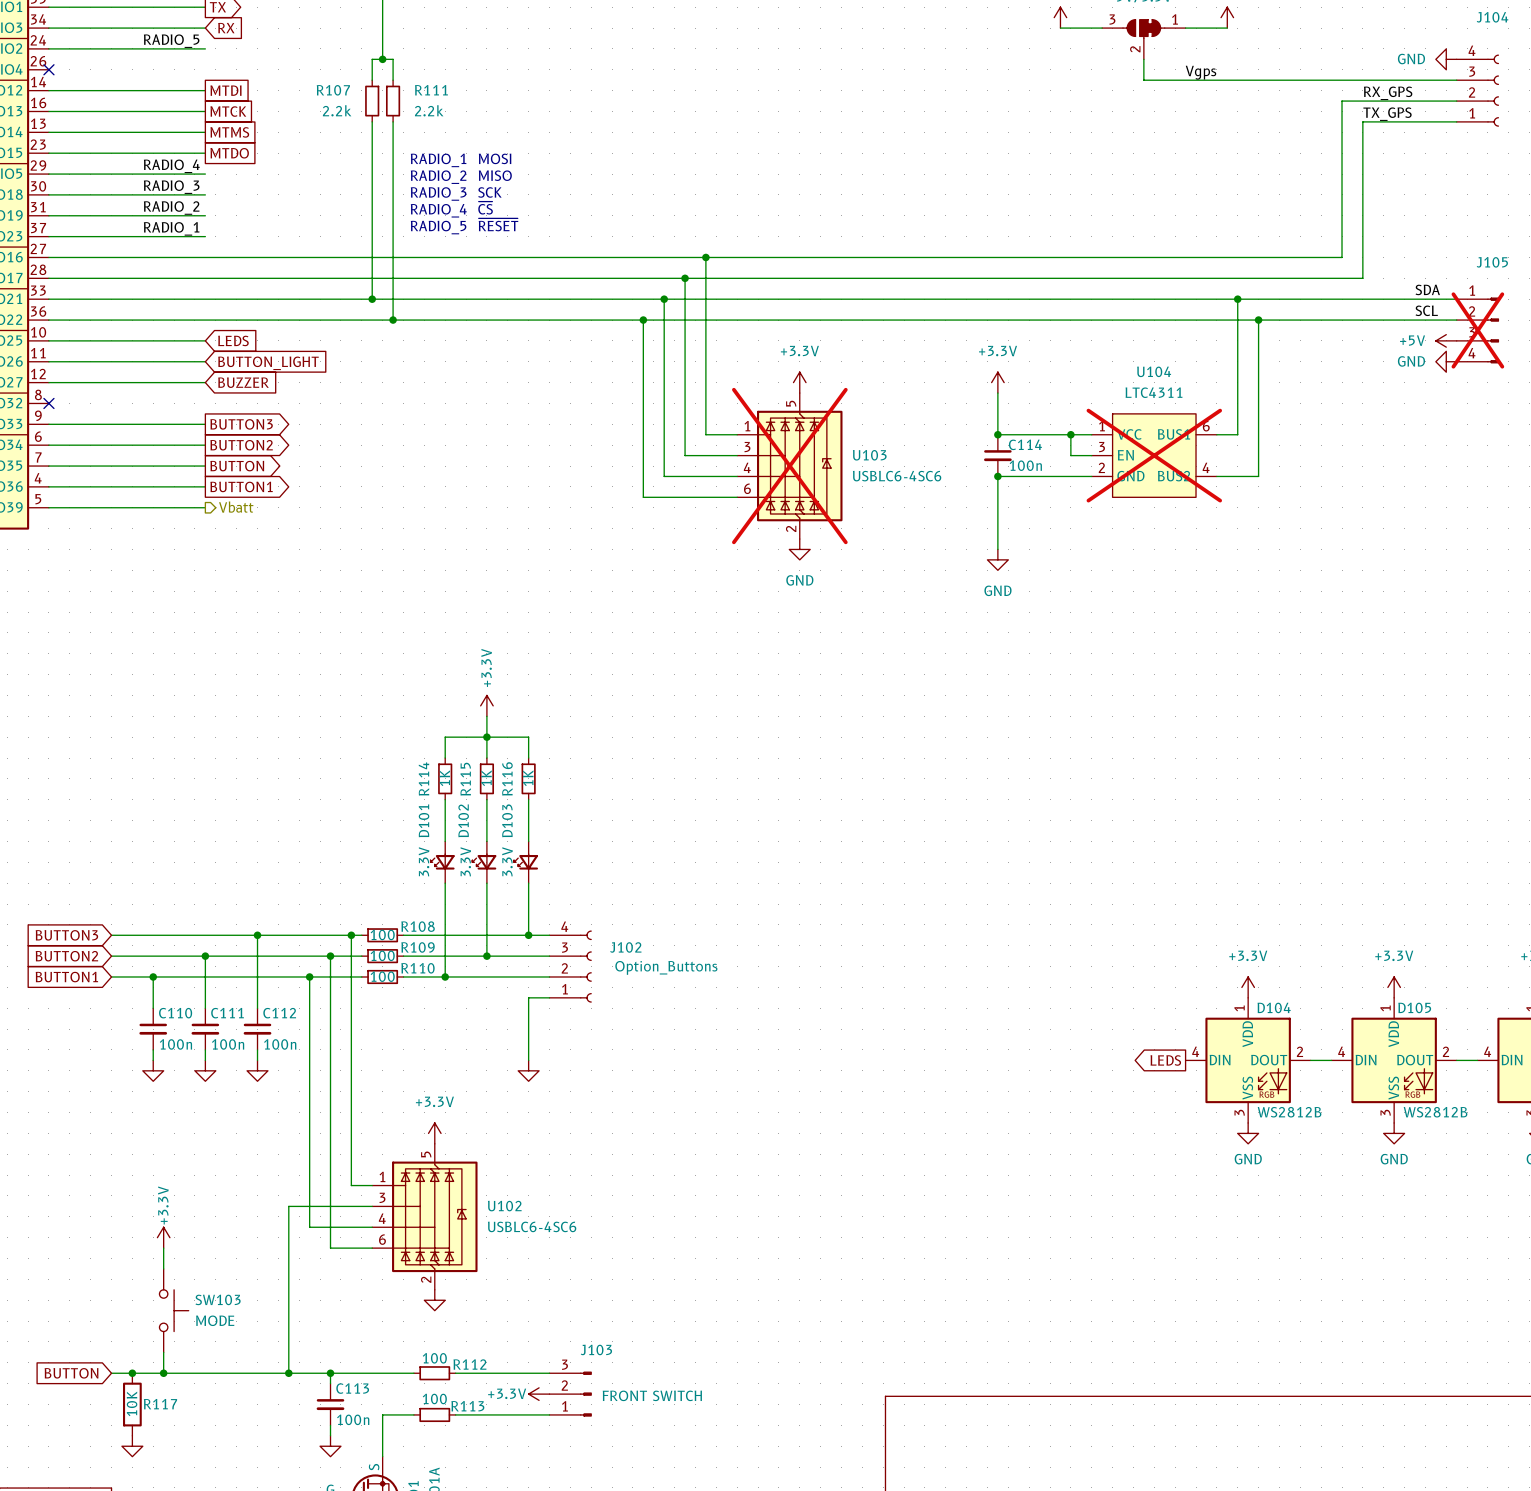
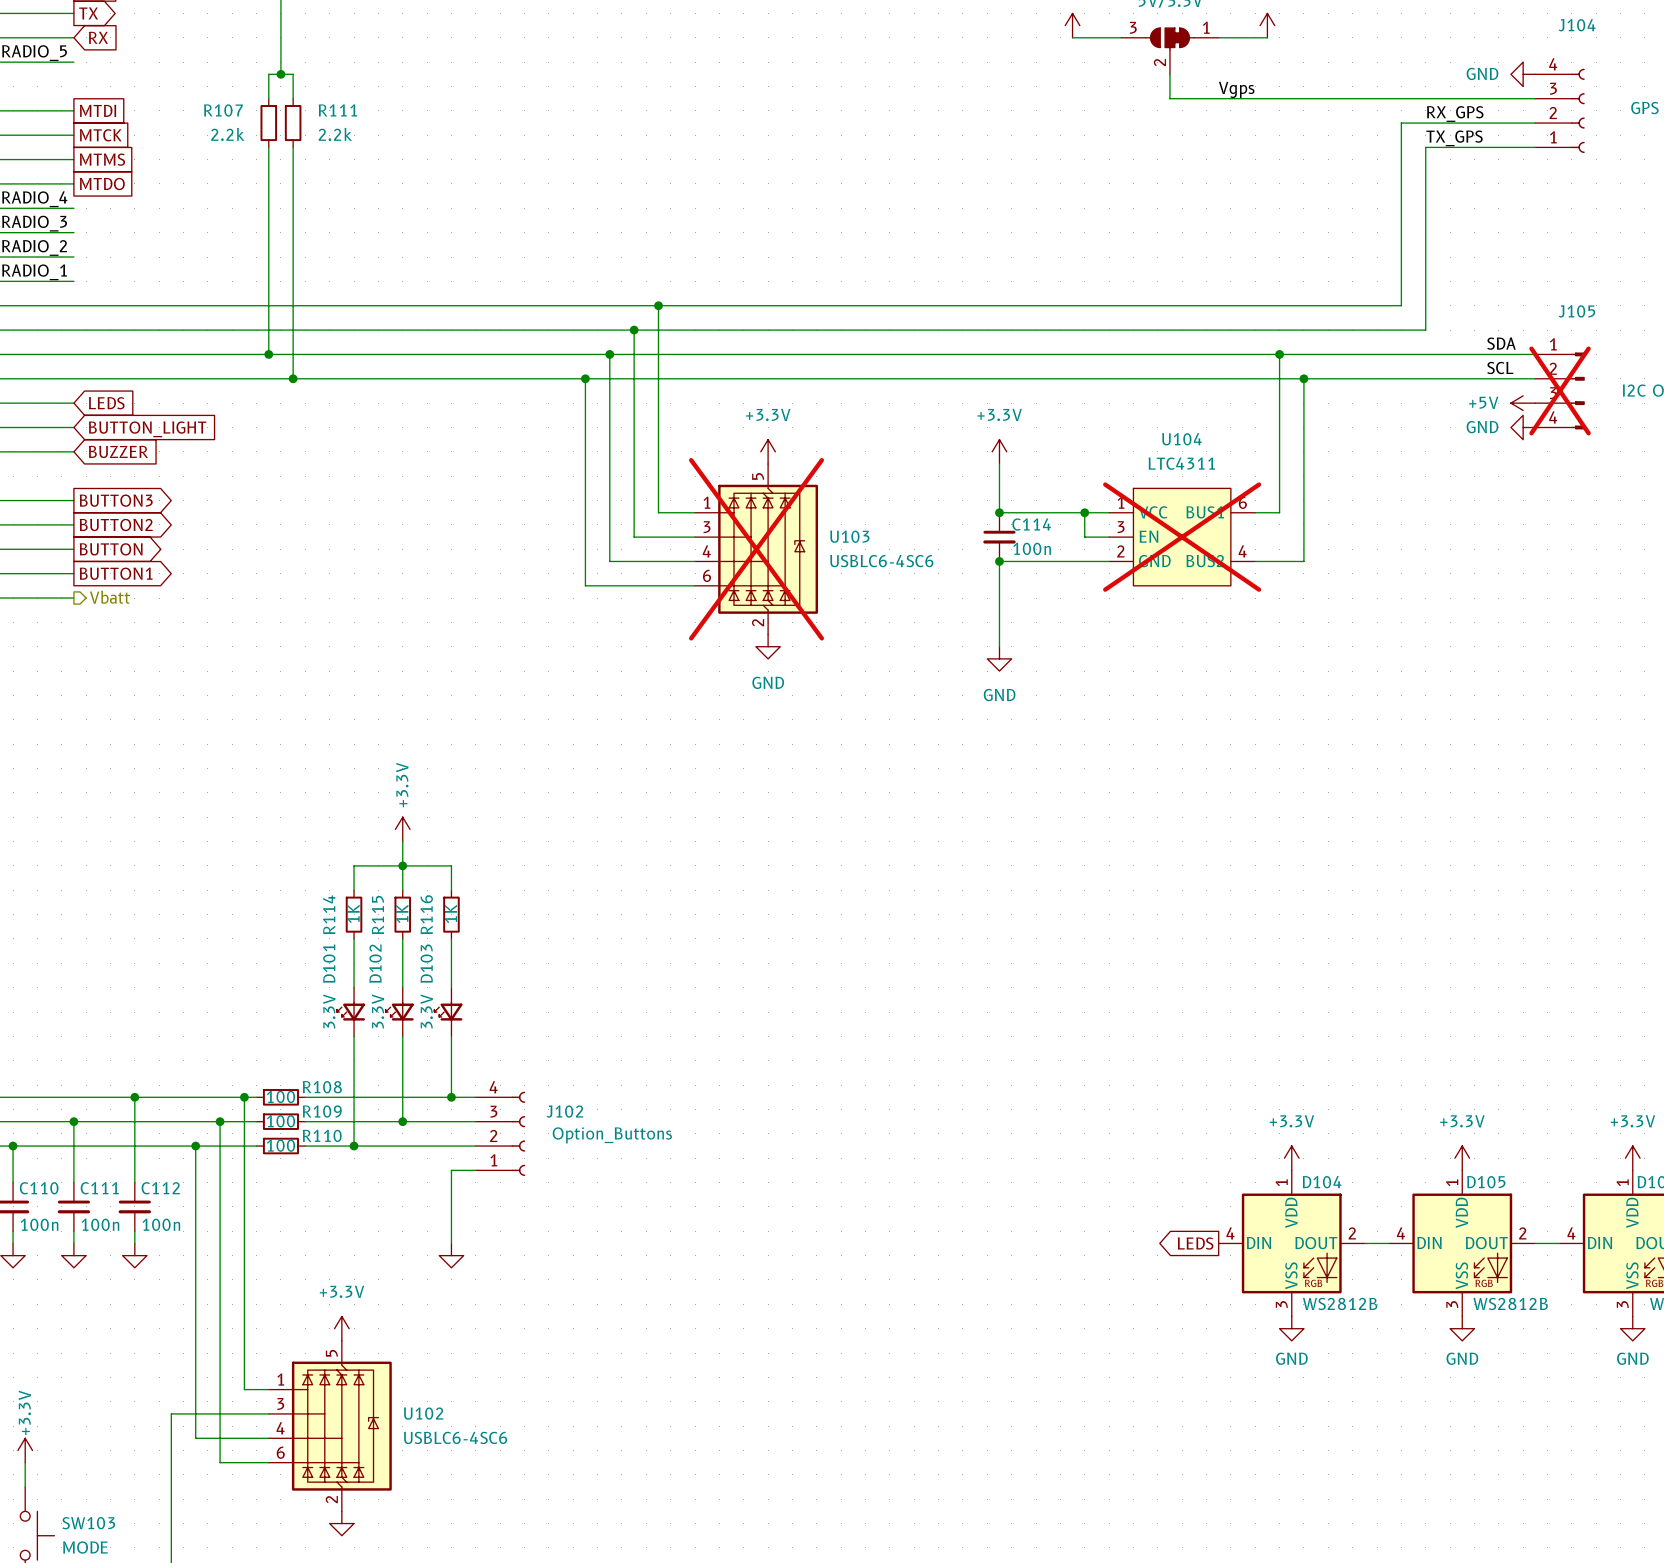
text: RADIO_1 MOSI (461, 160) -> none
text: RADIO_2 MISO (461, 177) -> none
text: RADIO_3 SCK (456, 193) -> none
text: RADIO_4 ~{CS} (451, 209) -> none
text: RADIO_5 ~{RESET} (464, 226) -> none

